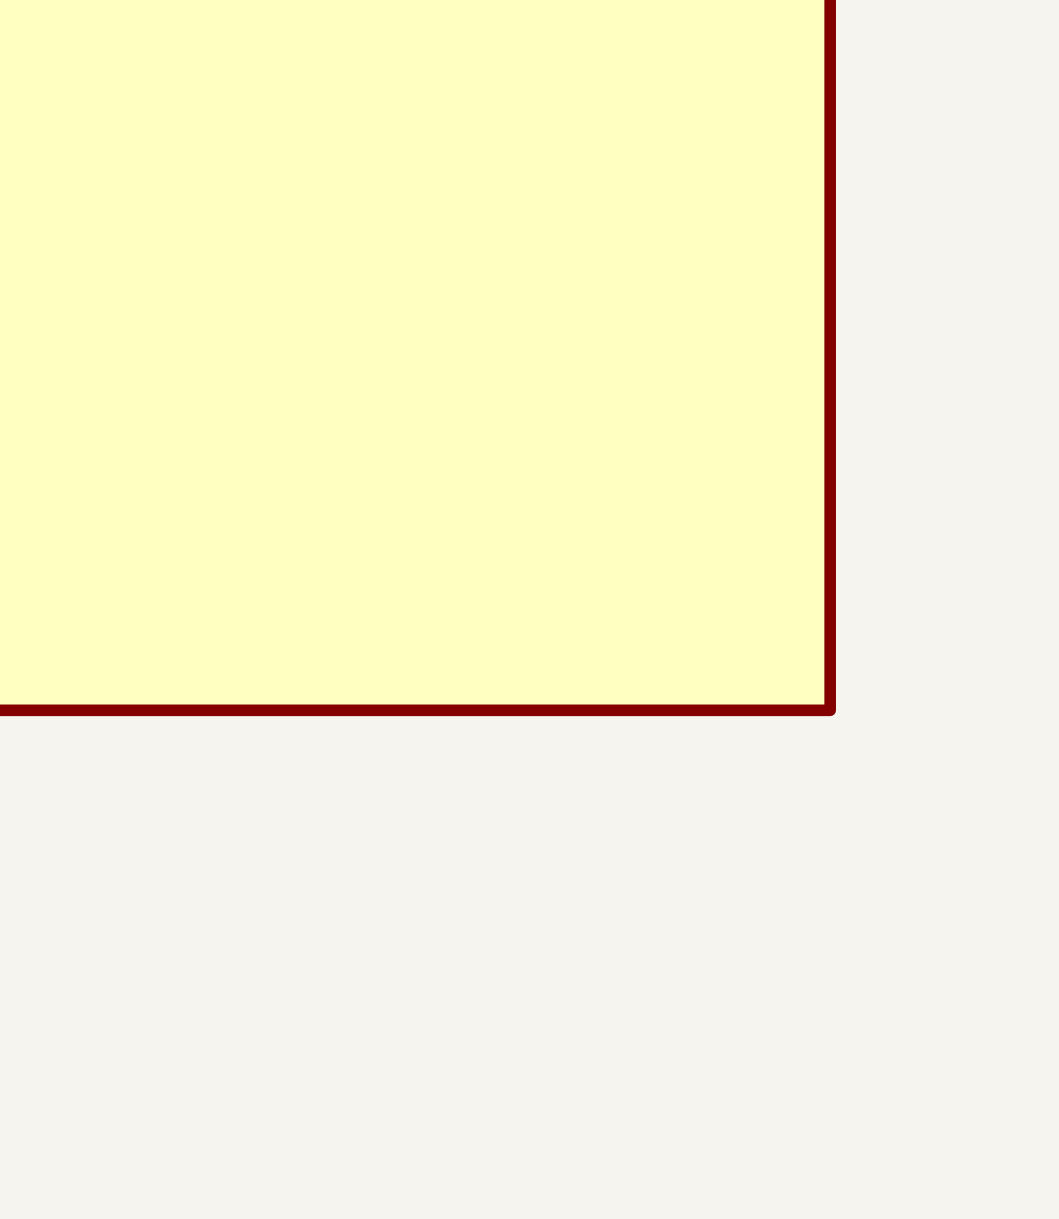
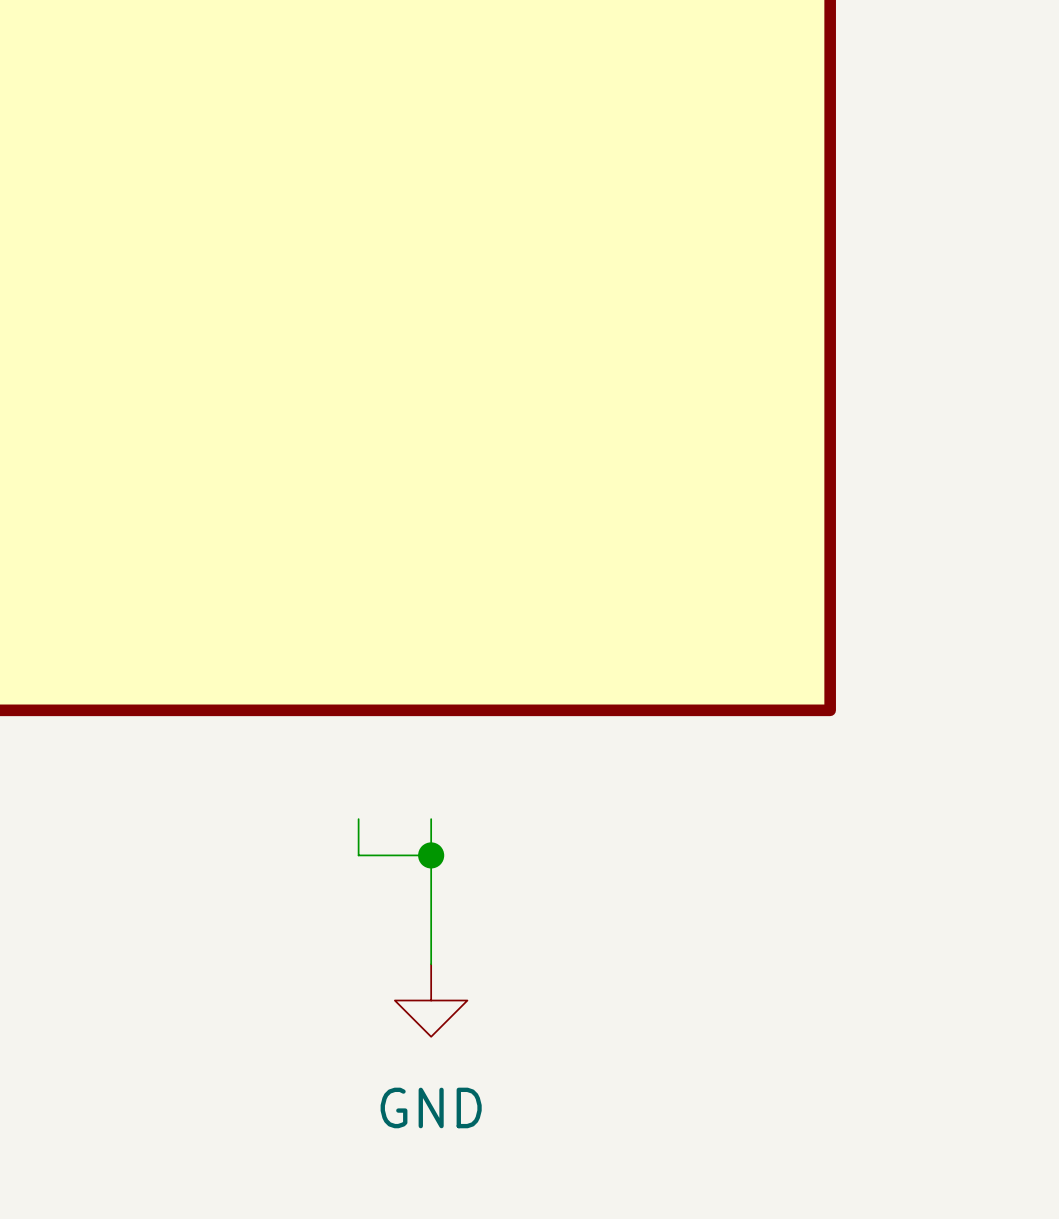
wire: none -> (358, 819) (358, 855) (431, 855)
wire: none -> (431, 819) (431, 964)
junction: none -> (431, 855)
power symbol: none -> GND (431, 1000)

